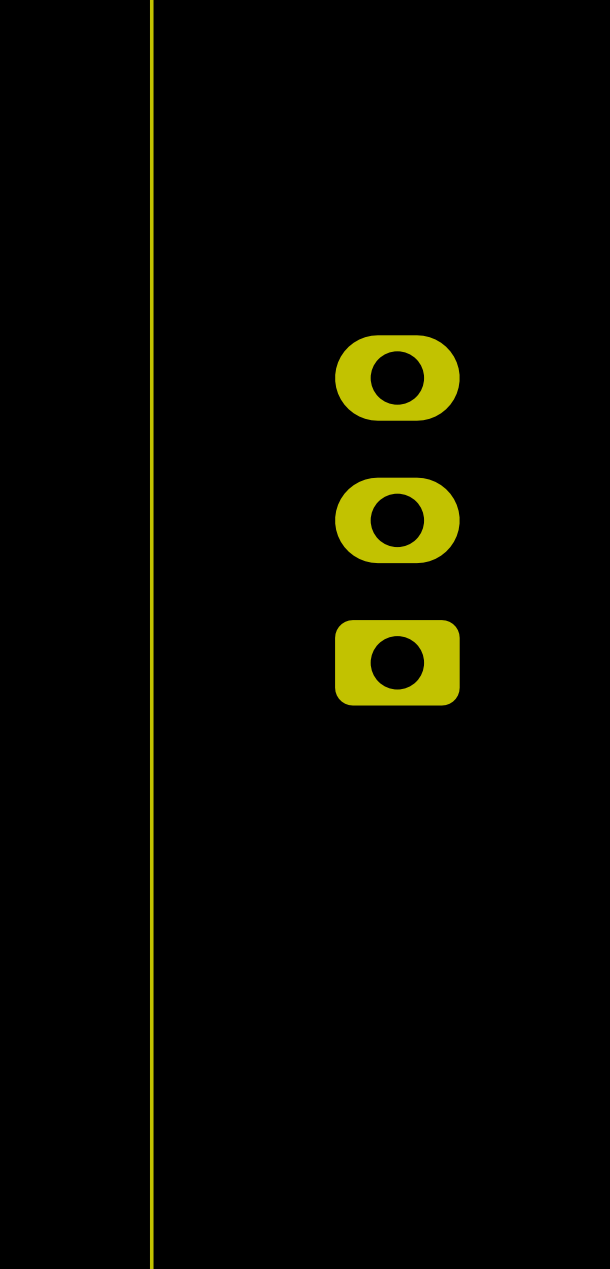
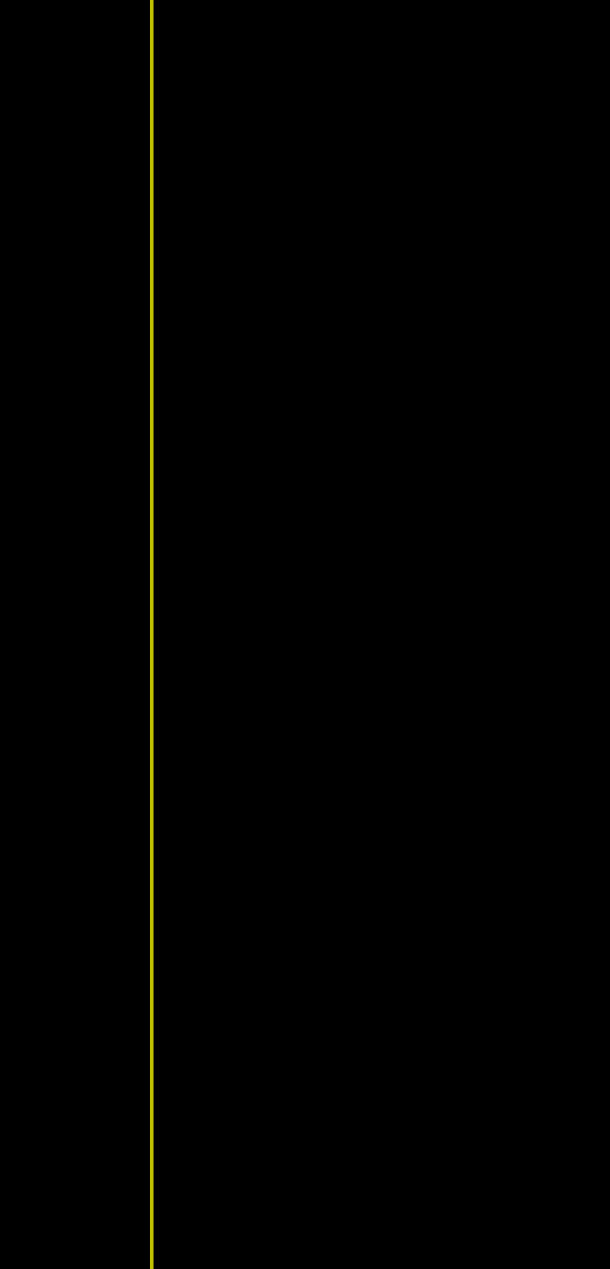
part: (397, 520) -> none

